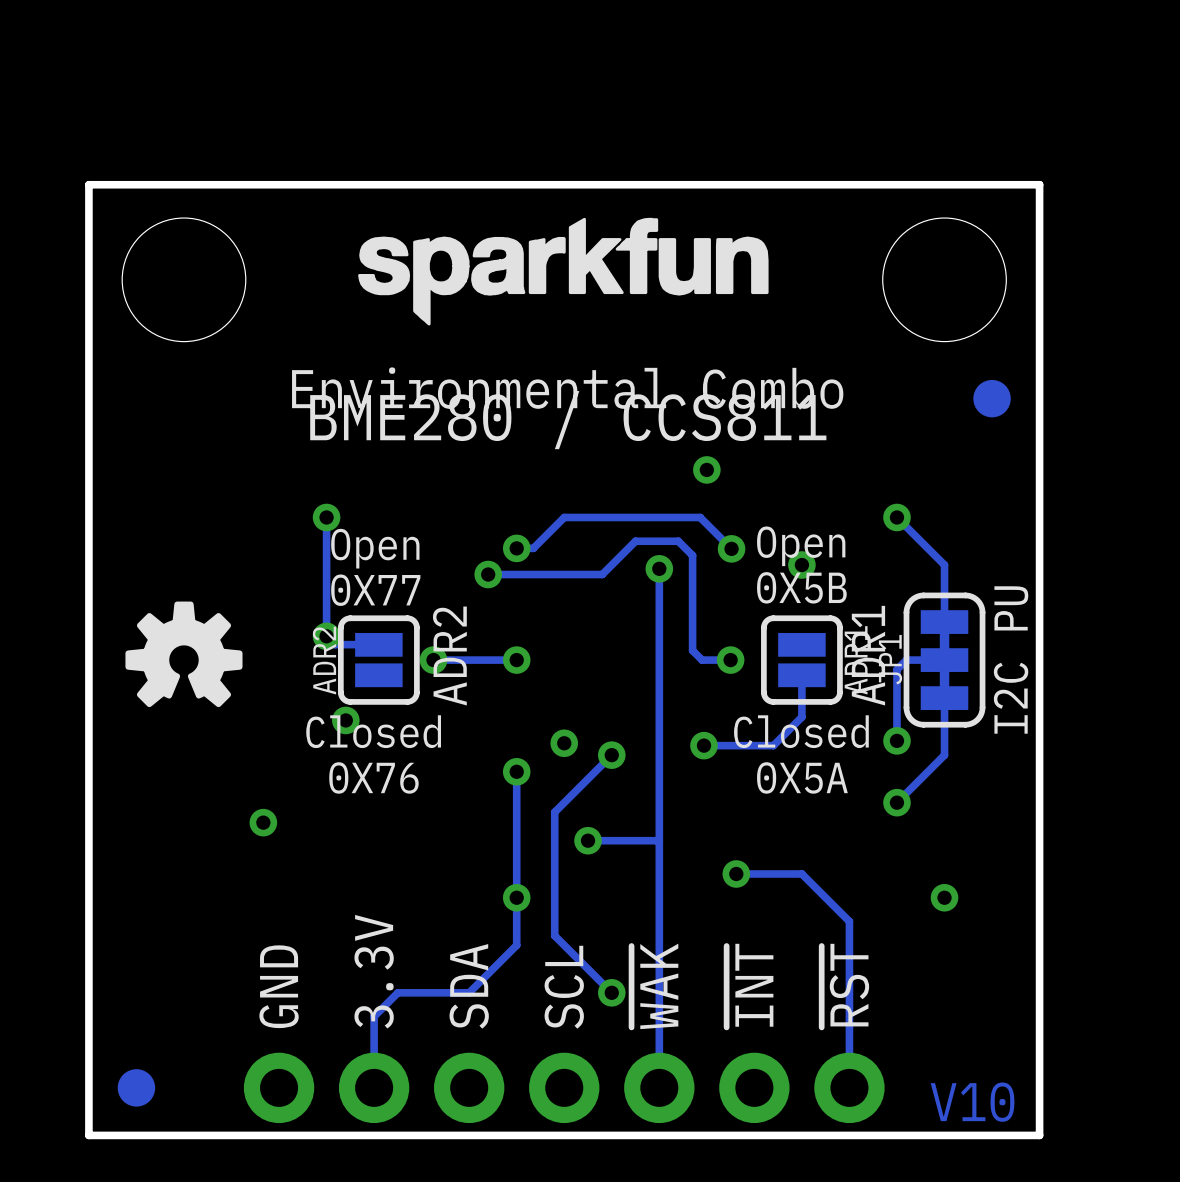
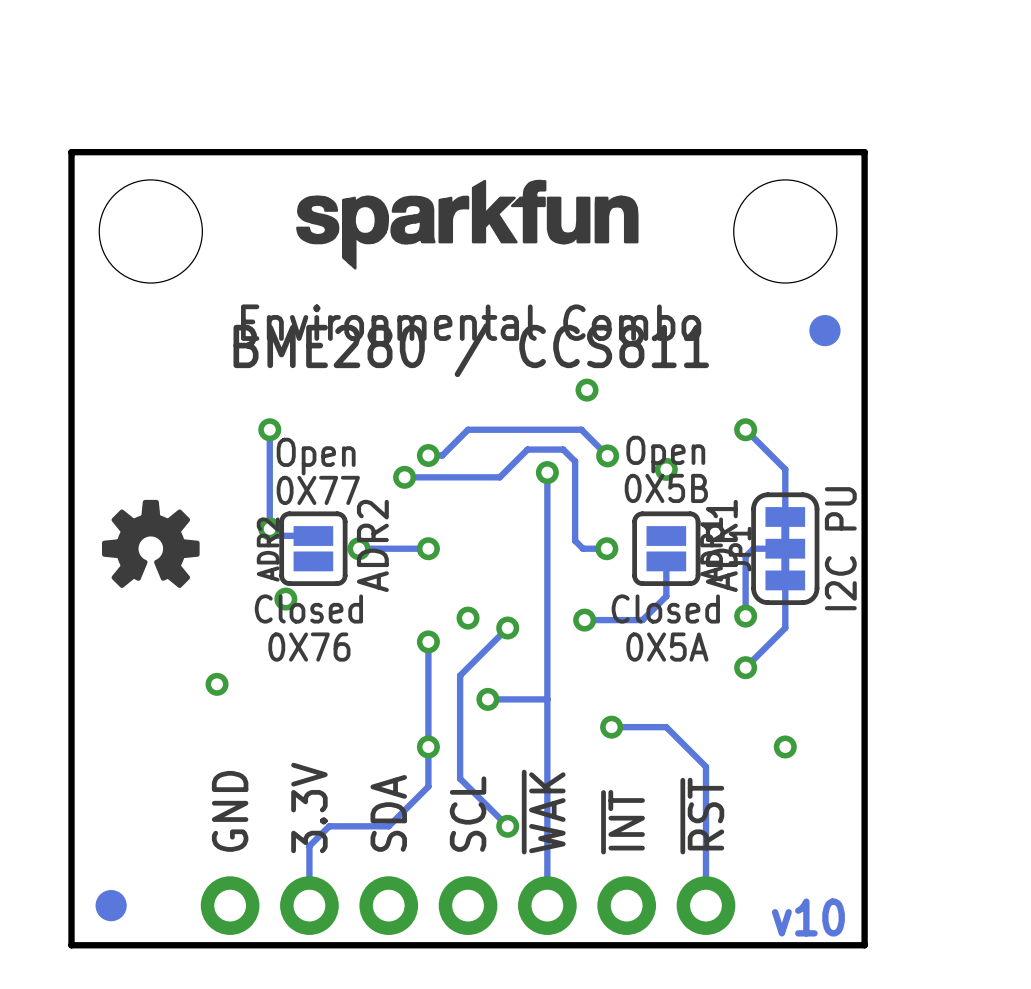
text: V10 (972, 1102) -> v10 (808, 917)

